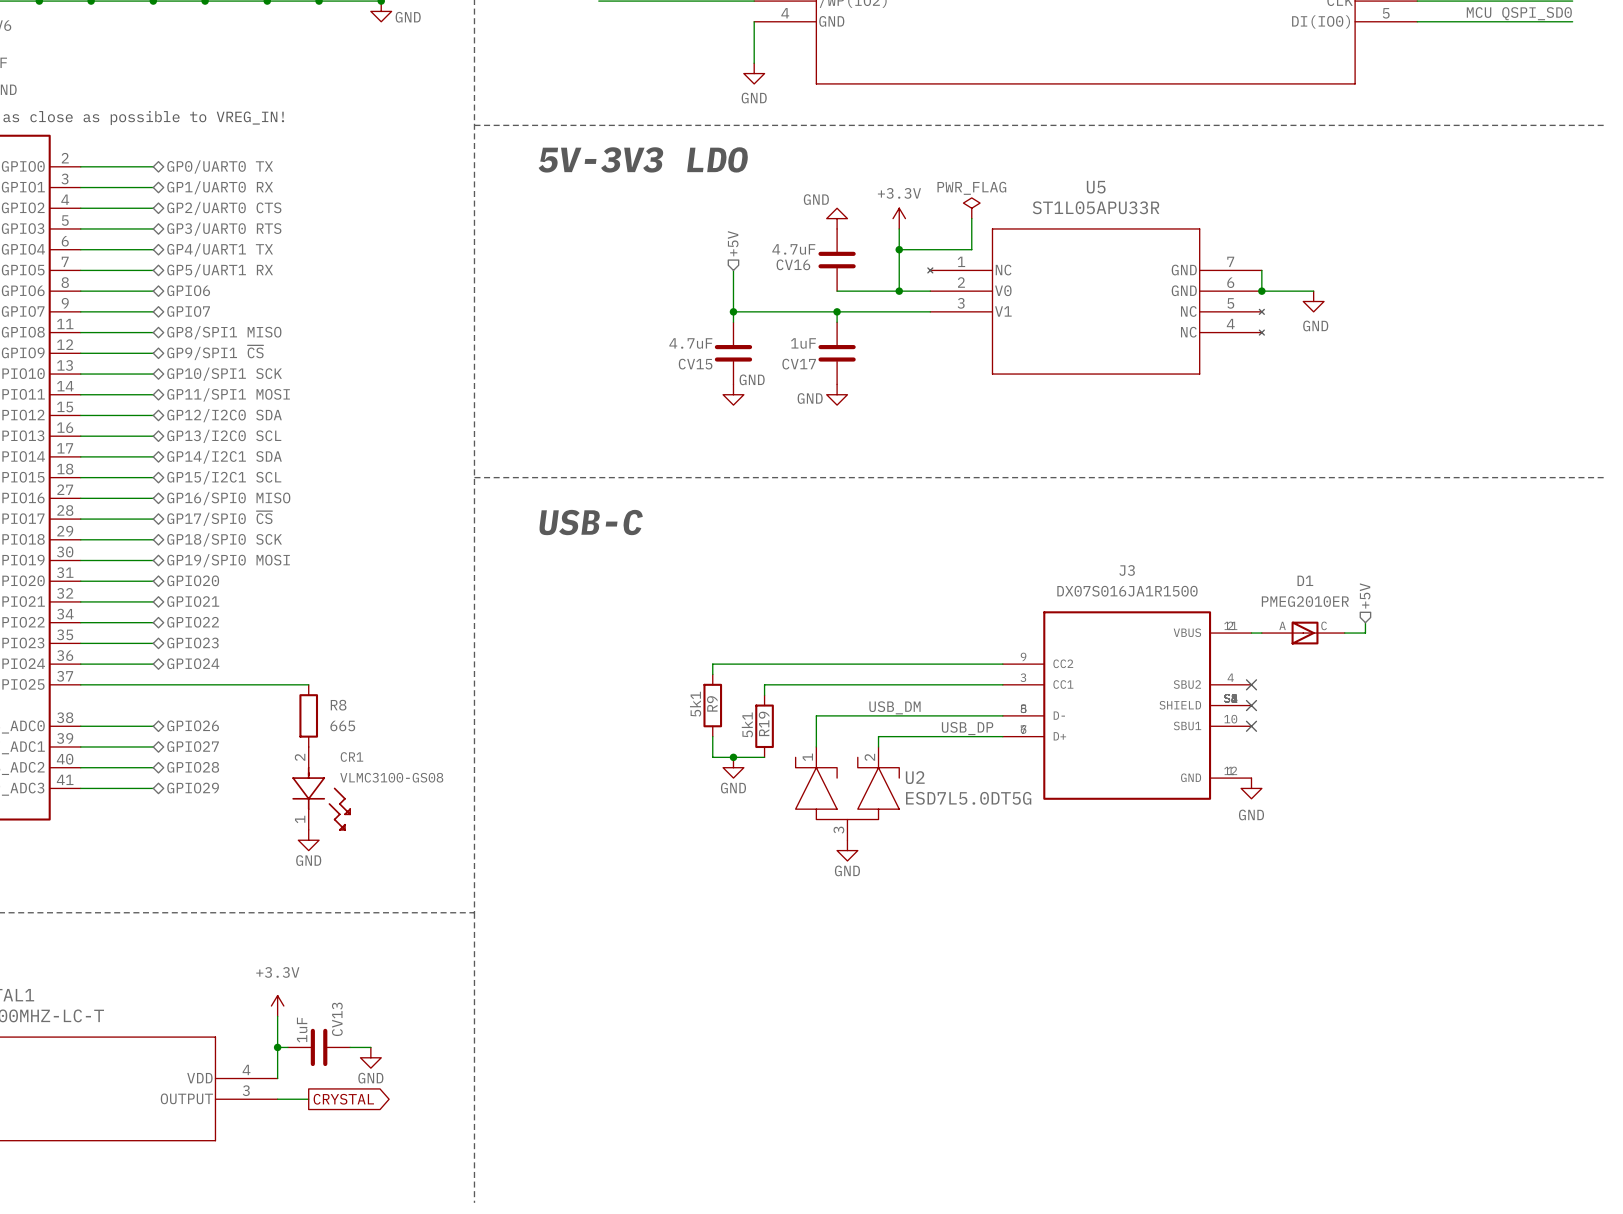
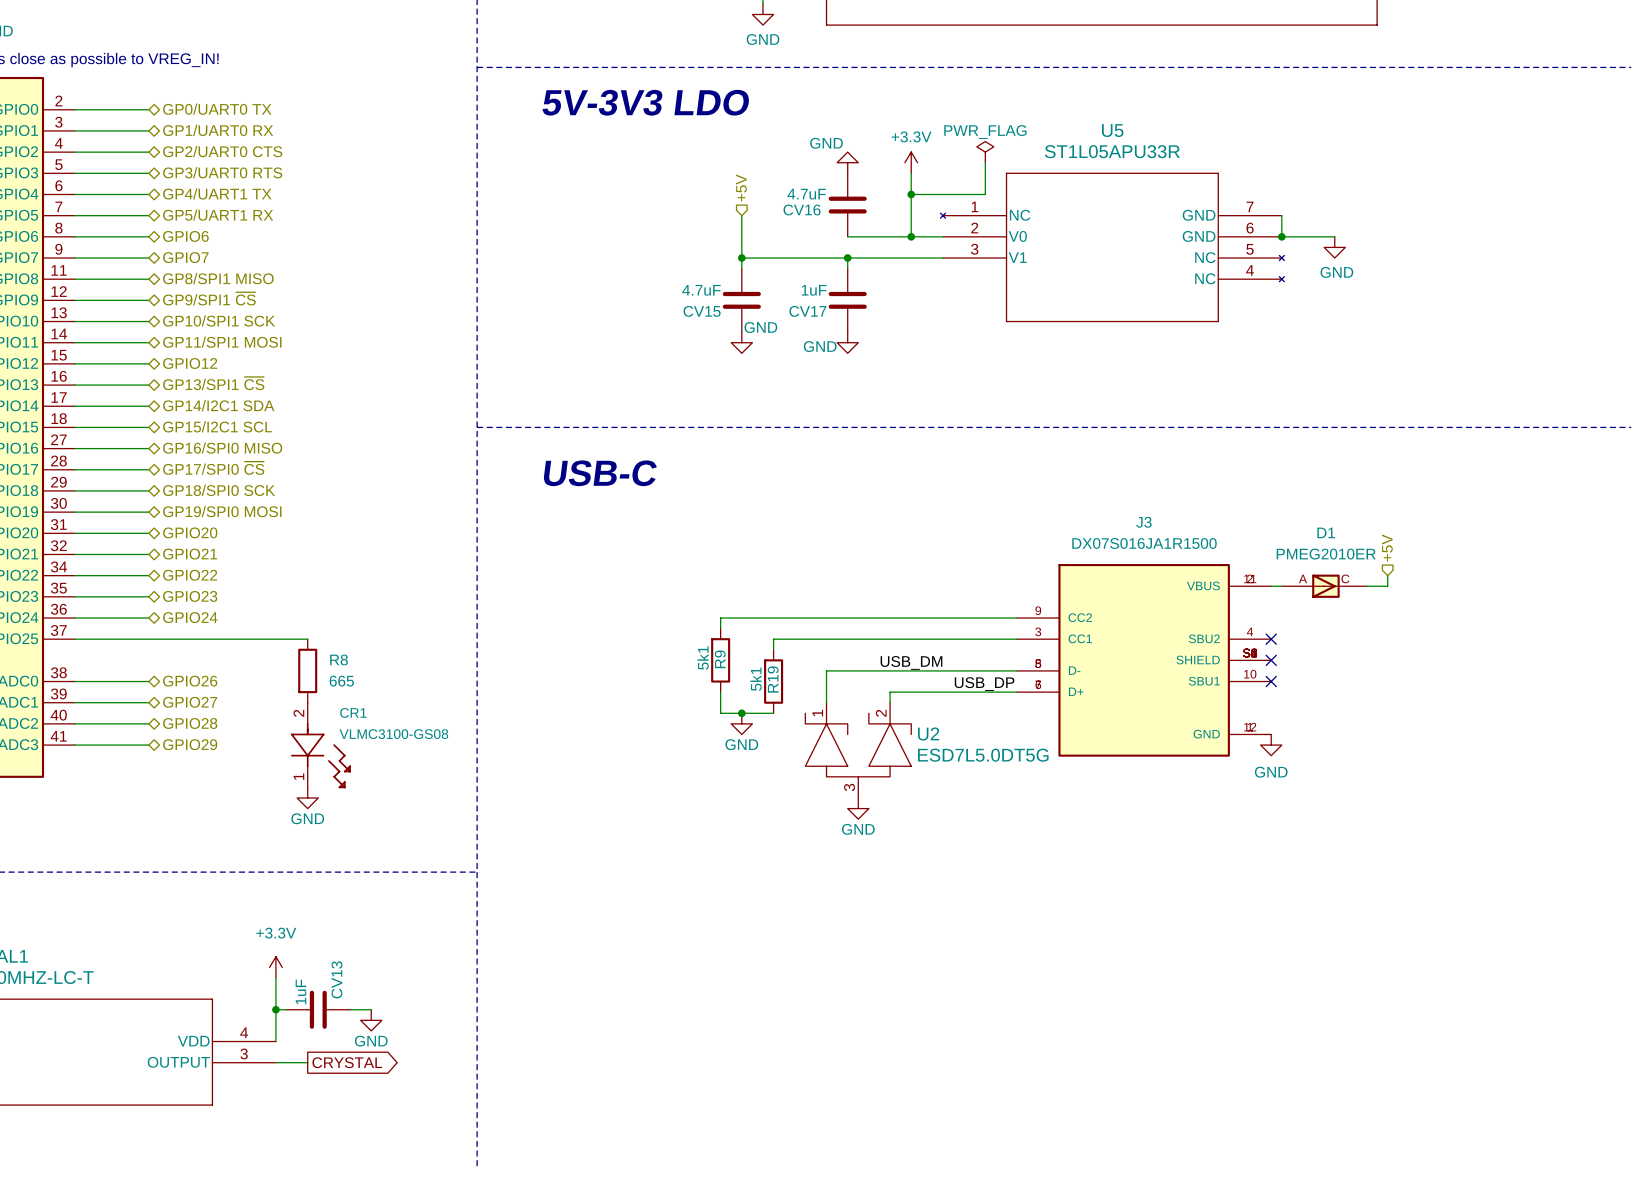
hierarchical label: GP12/I2C0 SDA (224, 415) -> GPIO12 (190, 363)
hierarchical label: GP13/I2C0 SCL (224, 436) -> GP13/SPI1 ~{CS} (213, 383)

